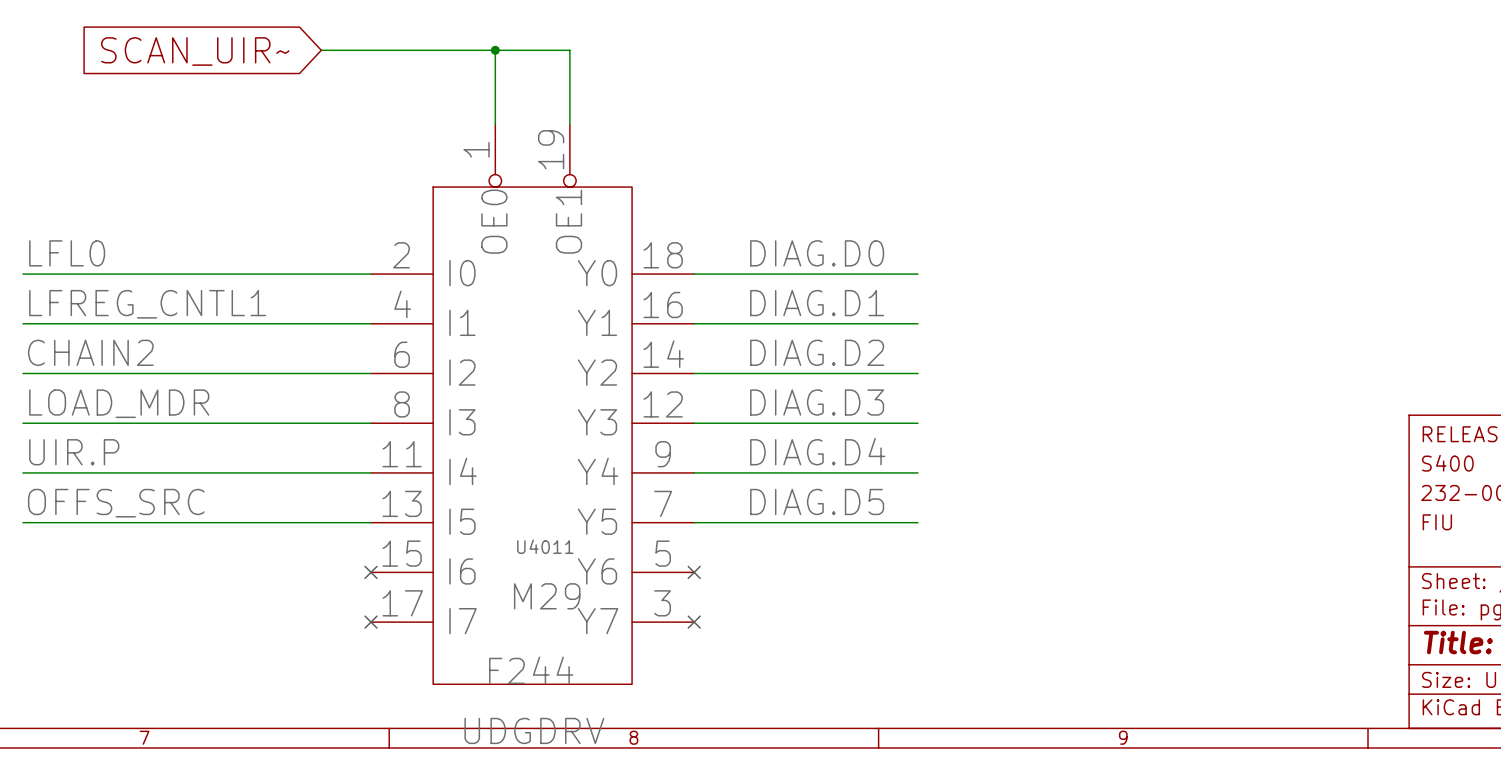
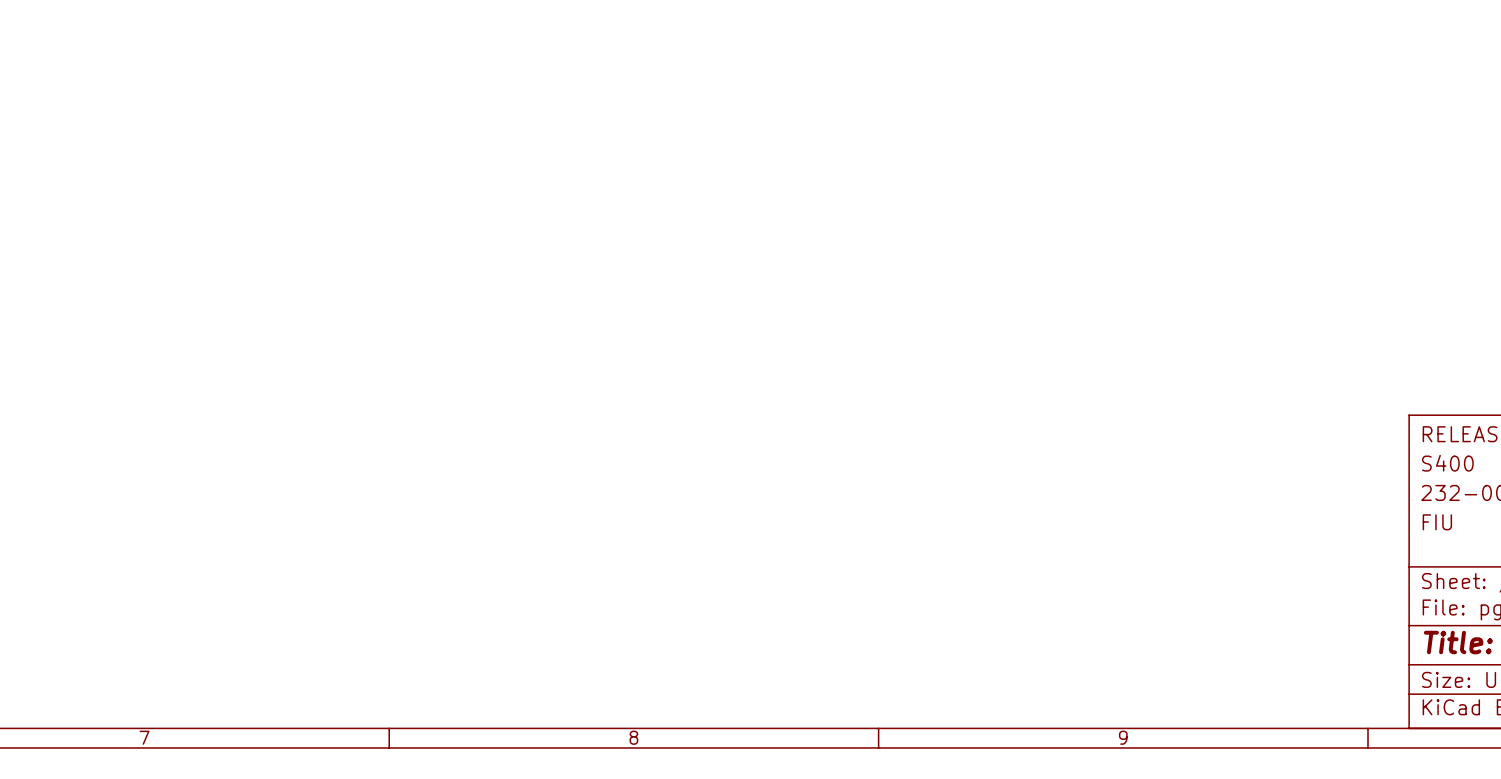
wire: (321, 50) (569, 50) (569, 124) -> none
wire: (495, 50) (495, 124) -> none
junction: (495, 50) -> none
global label: SCAN_UIR~ (195, 51) -> none
label: LFL0 (67, 253) -> none
label: DIAG.D0 (817, 253) -> none
wire: (22, 274) (371, 274) -> none
wire: (694, 274) (917, 274) -> none
label: DIAG.D1 (817, 303) -> none
label: LFREG_CNTL1 (147, 304) -> none
wire: (22, 323) (371, 323) -> none
wire: (694, 323) (917, 323) -> none
label: CHAIN2 (90, 352) -> none
label: DIAG.D2 (817, 352) -> none
wire: (22, 373) (371, 373) -> none
wire: (694, 373) (917, 373) -> none
label: DIAG.D3 (817, 402) -> none
label: LOAD_MDR (119, 403) -> none
U4011: F244 (532, 404) -> none
wire: (22, 423) (371, 423) -> none
wire: (694, 423) (917, 423) -> none
label: DIAG.D4 (817, 451) -> none
label: UIR.P (74, 452) -> none
wire: (22, 472) (371, 472) -> none
wire: (694, 472) (917, 472) -> none
label: DIAG.D5 (817, 501) -> none
label: OFFS_SRC (116, 503) -> none
wire: (22, 522) (371, 522) -> none
wire: (694, 522) (917, 522) -> none
no-connect mark: (371, 572) -> none
no-connect mark: (694, 572) -> none
no-connect mark: (371, 622) -> none
no-connect mark: (694, 622) -> none

